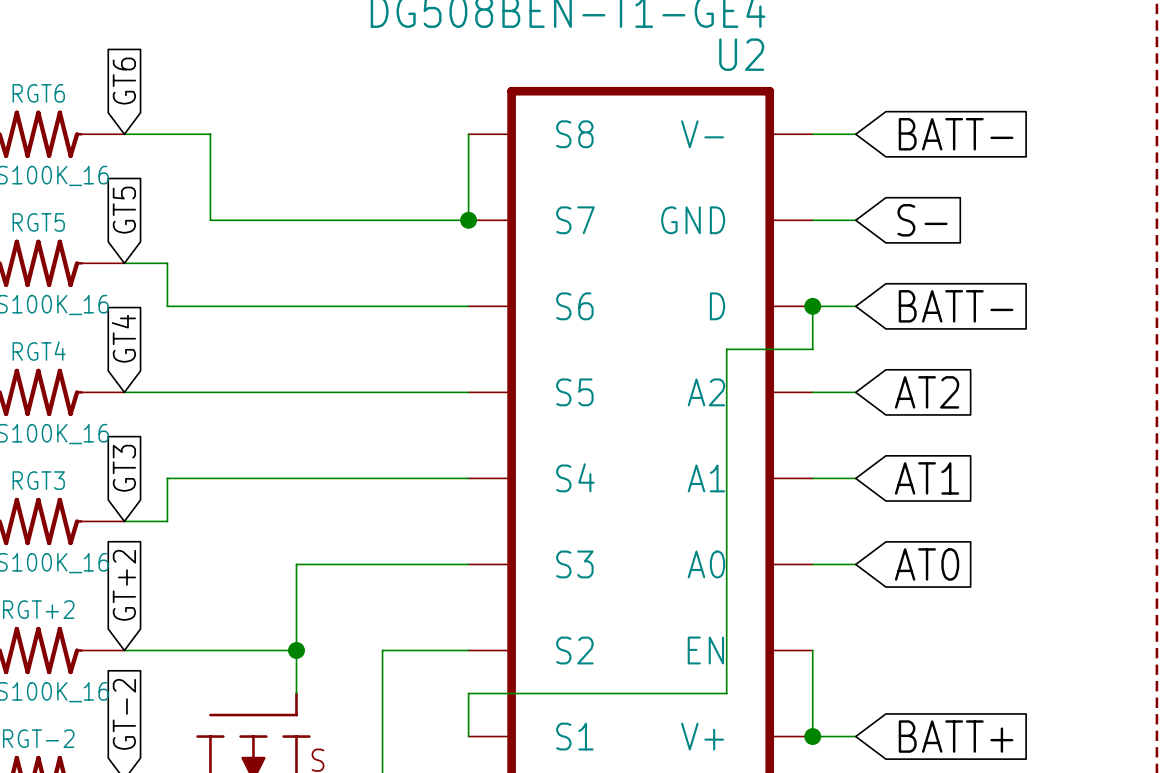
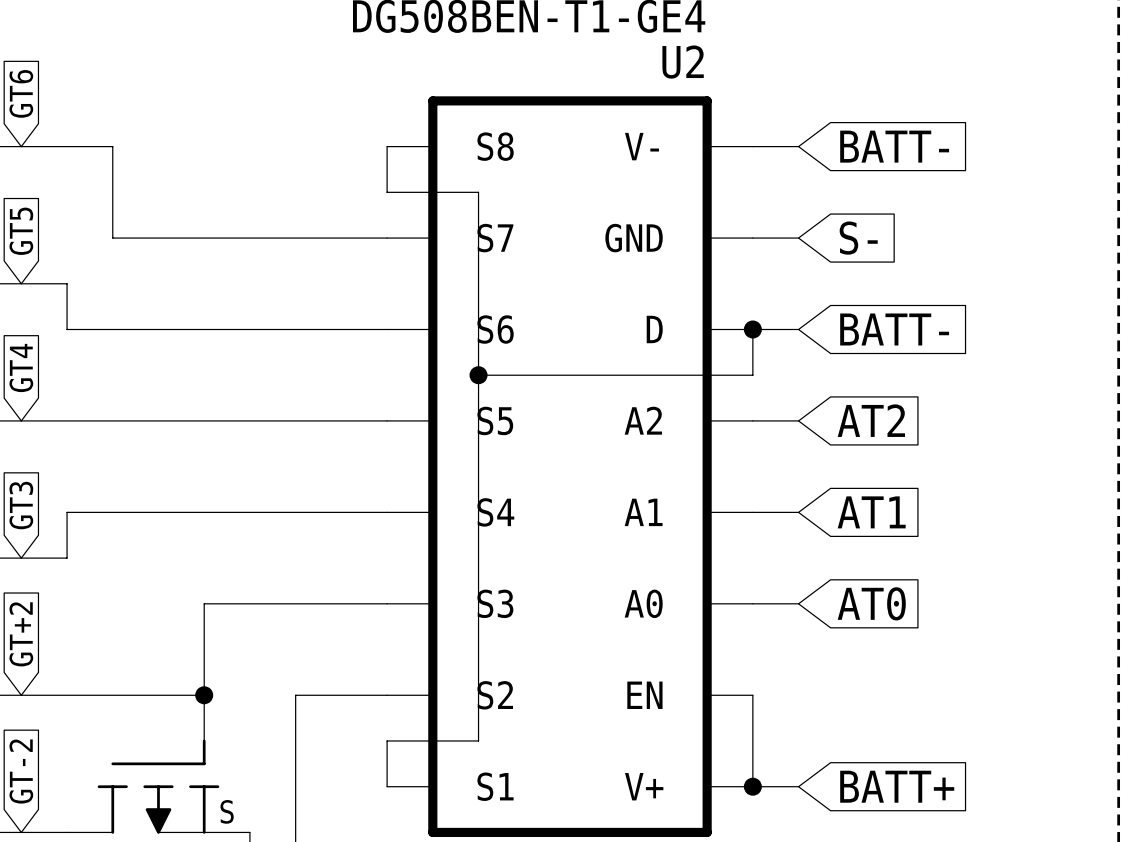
wire: (468, 177) (468, 220) -> none
junction: (468, 220) -> none
wire: none -> (478, 375) (661, 375)
junction: none -> (478, 375)
wire: (726, 349) (726, 693) (554, 693) -> (387, 192) (478, 192) (478, 740)

